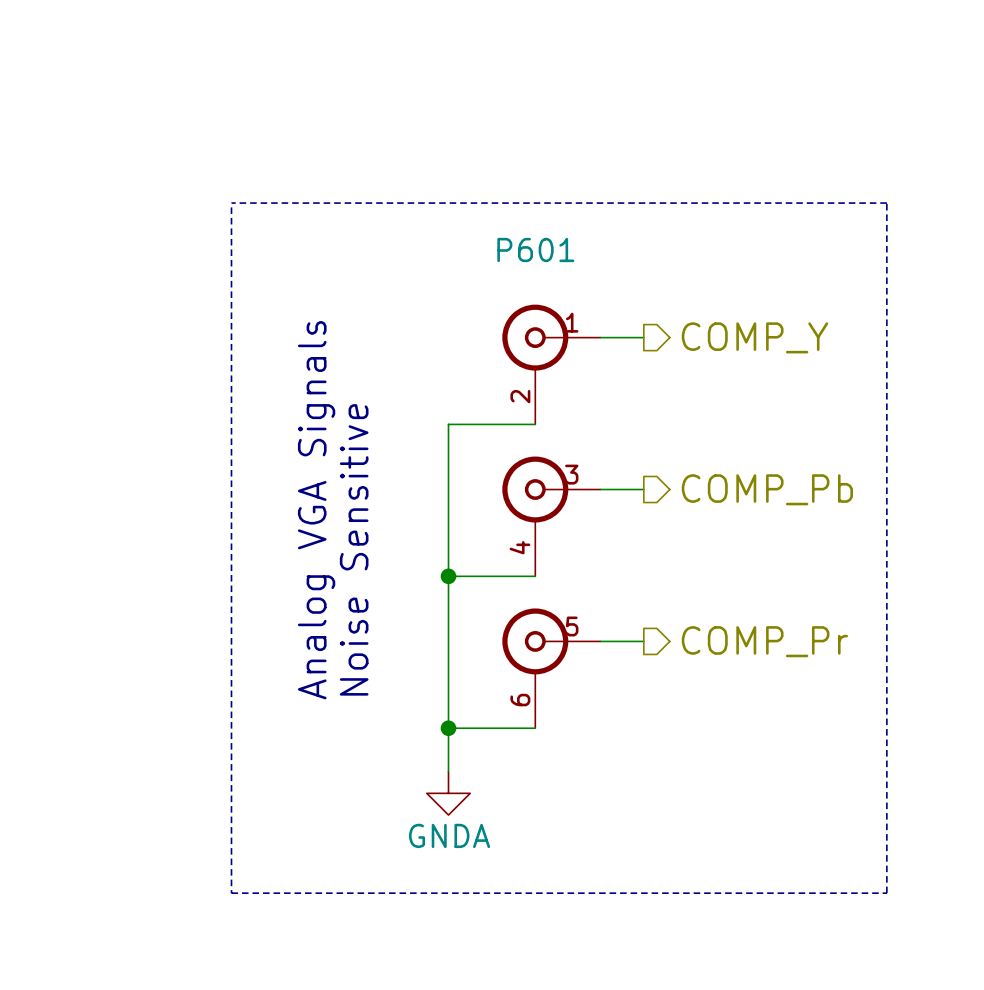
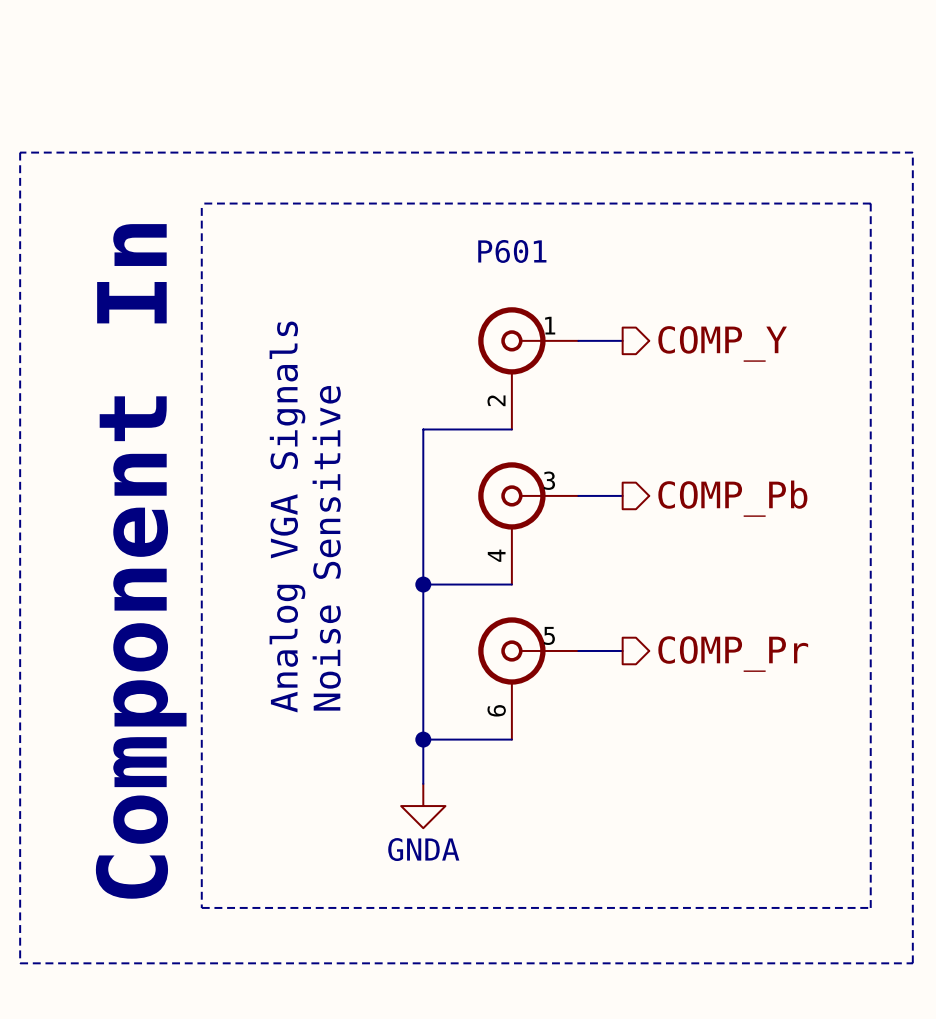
line: none -> (20, 152) (20, 963) (912, 963) (912, 152) (20, 152)
text: none -> Component In (141, 561)

